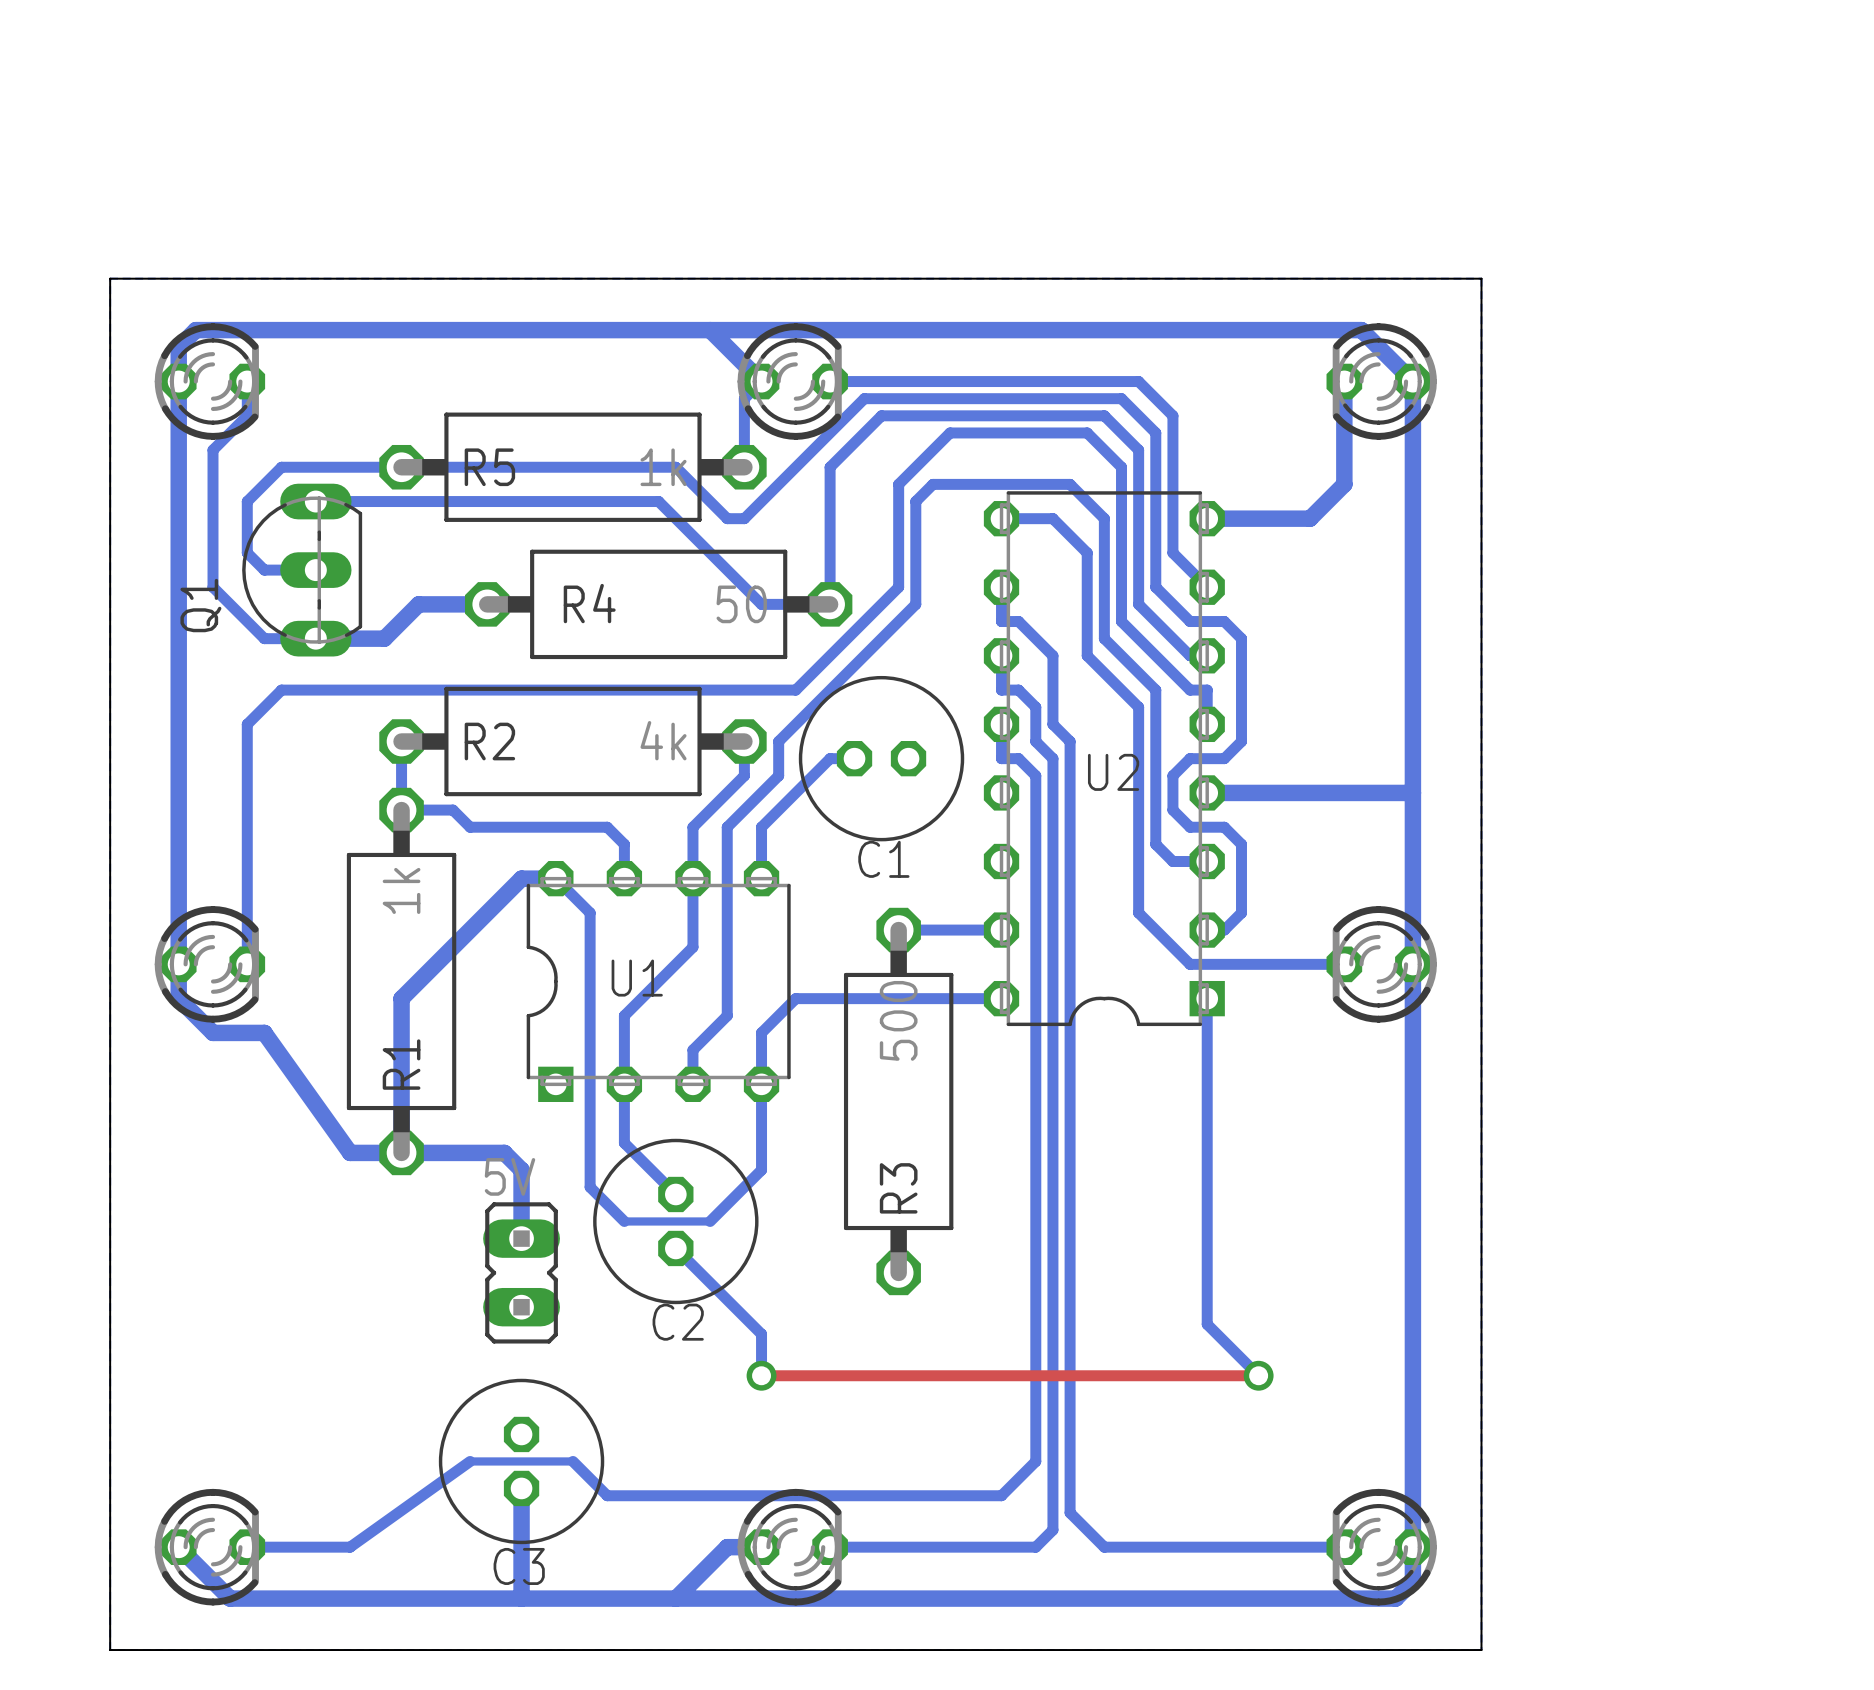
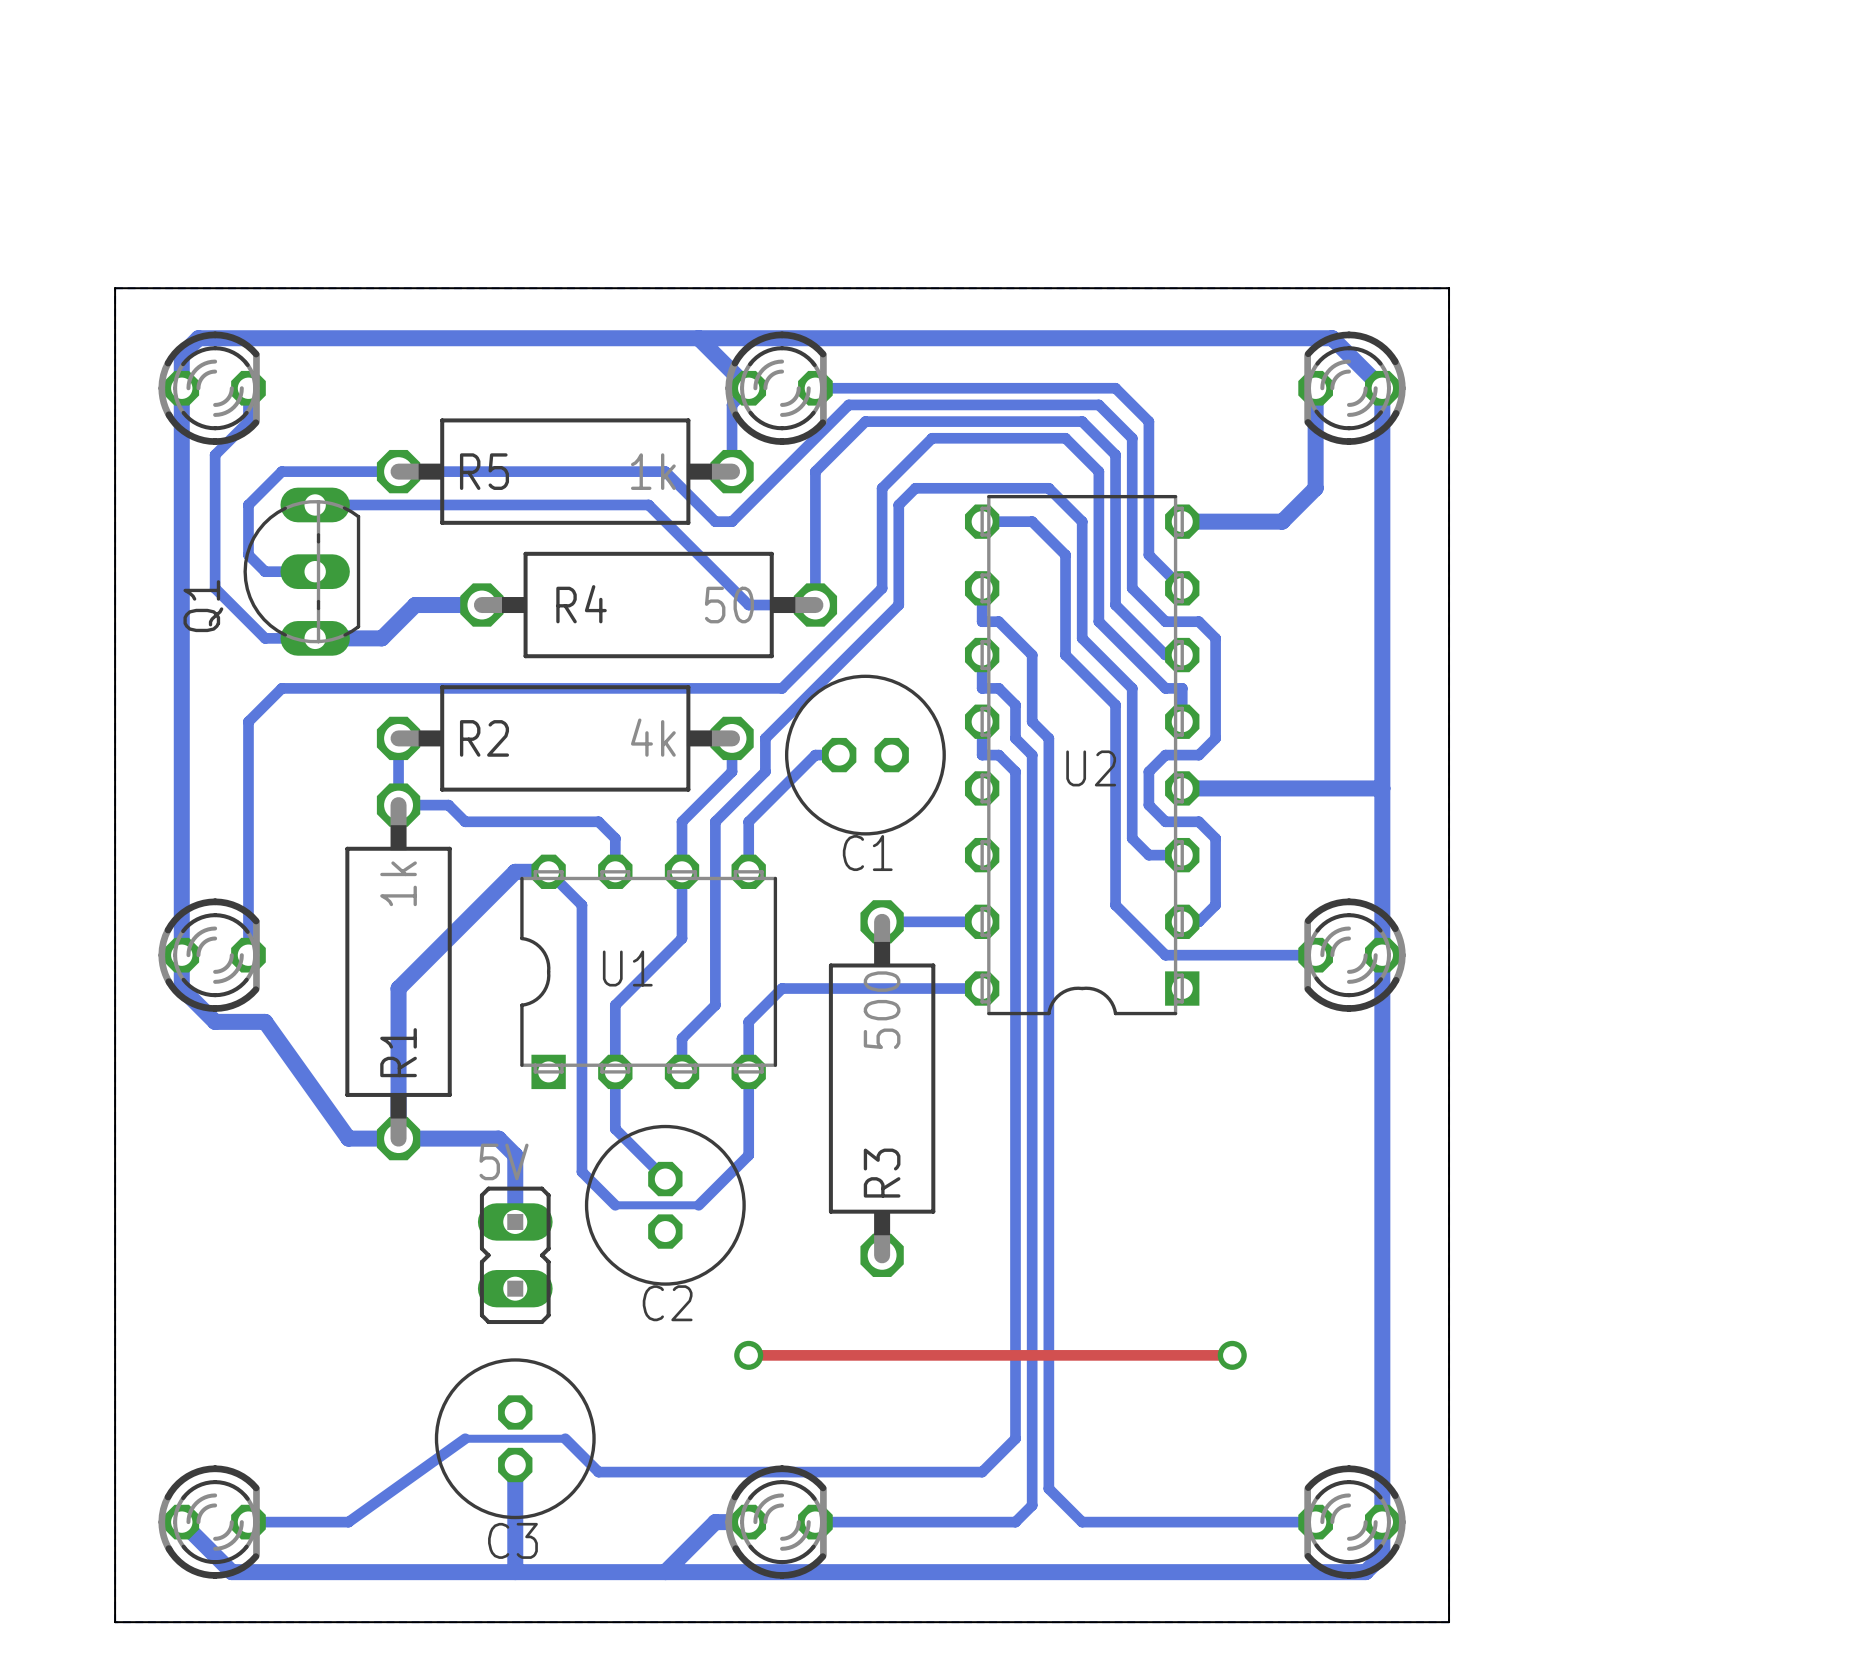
bottom track: (1207, 998) (1207, 1324) (1258, 1375) -> none
bottom track: (675, 1248) (761, 1334) (761, 1375) -> none

